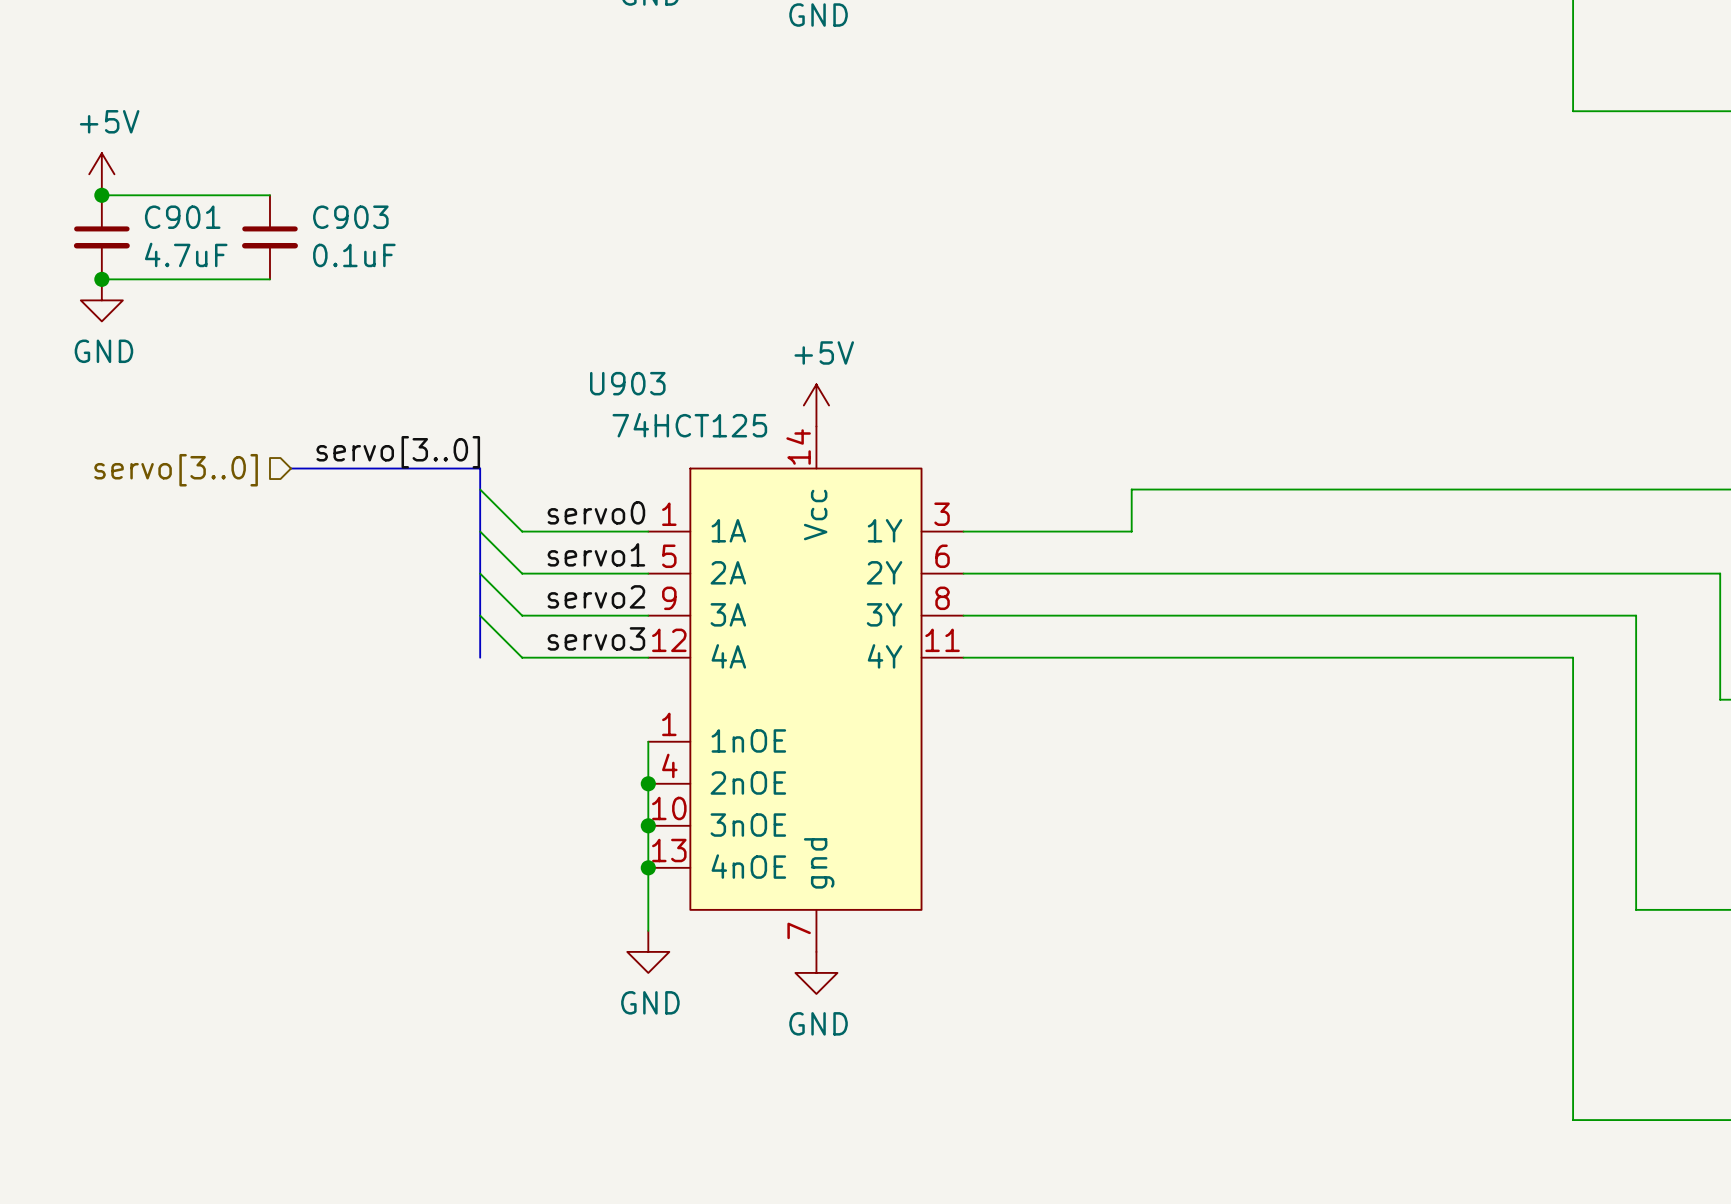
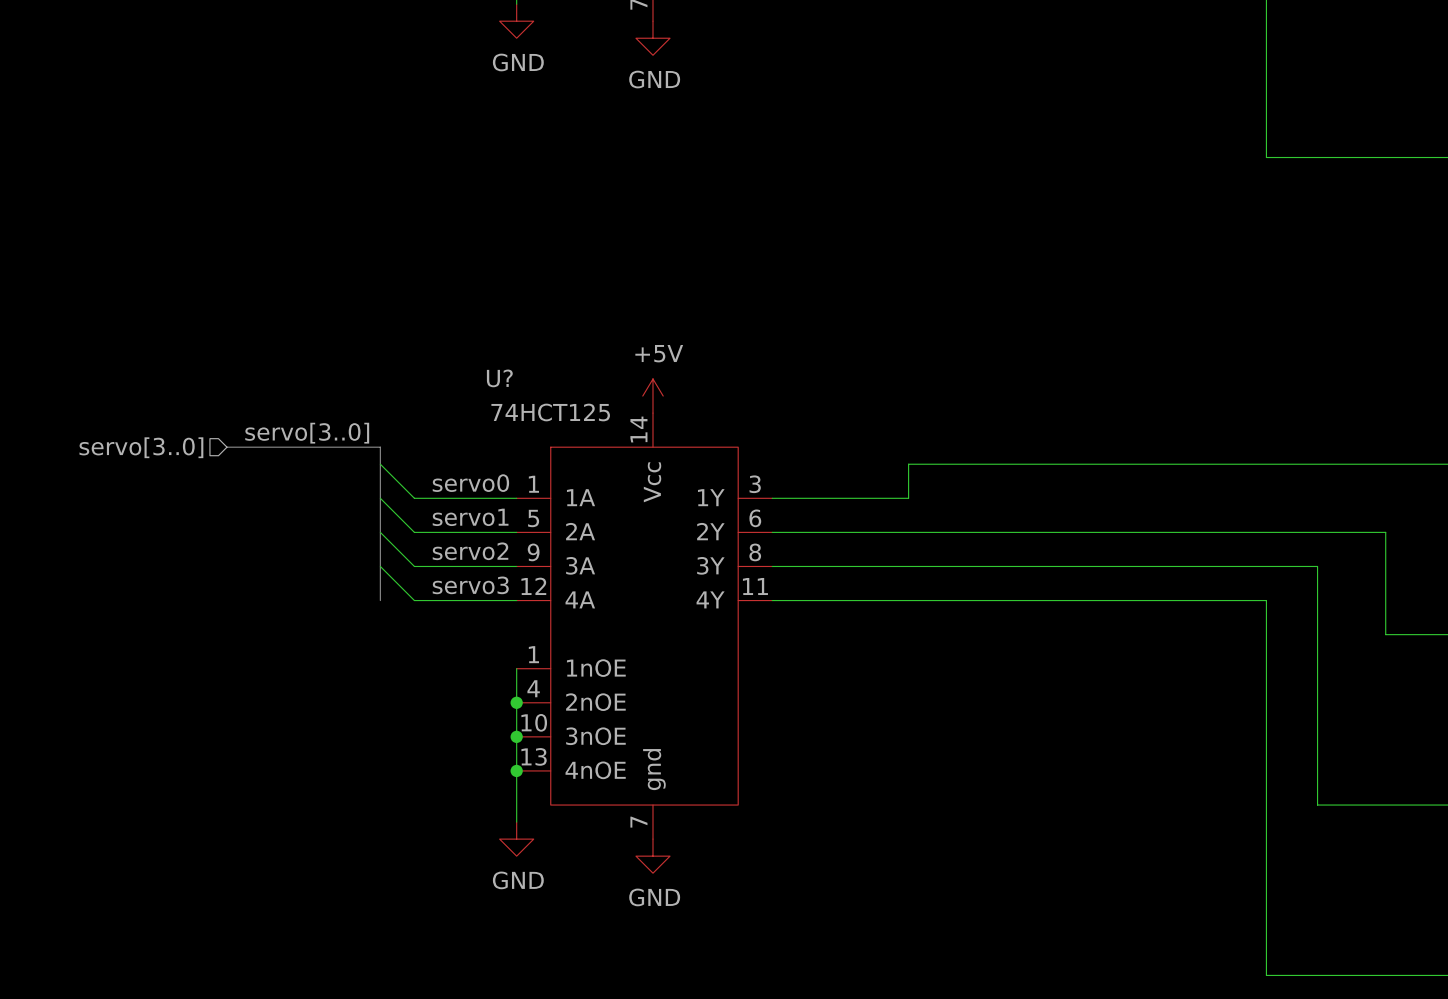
power symbol: +5V (101, 174) -> none
wire: (101, 195) (269, 195) -> none
junction: (101, 195) -> none
C901: 4.7uF (101, 237) -> none
C903: 0.1uF (269, 237) -> none
wire: (101, 279) (269, 279) -> none
junction: (101, 279) -> none
power symbol: GND (101, 300) -> none
U903 name: U903 (627, 383) -> U? (499, 378)

